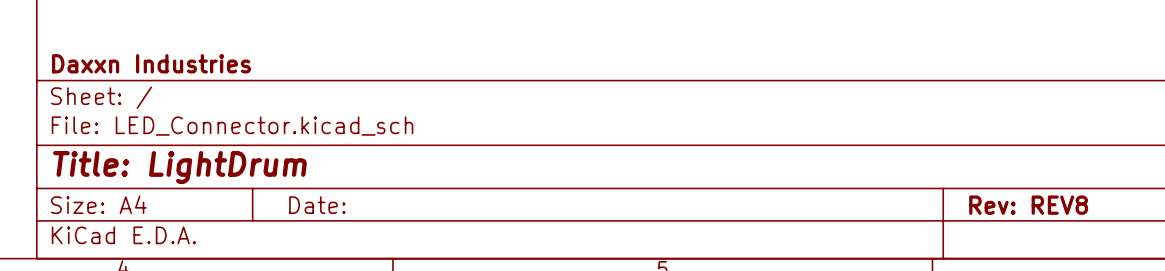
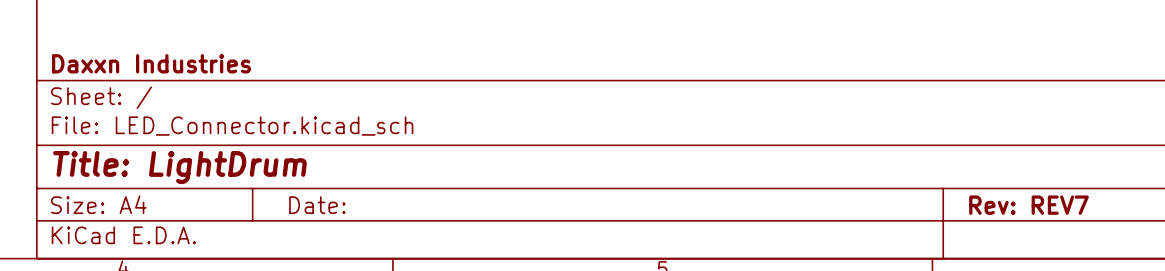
title block: Rev: REV8 (1028, 205) -> Rev: REV7 (1029, 205)

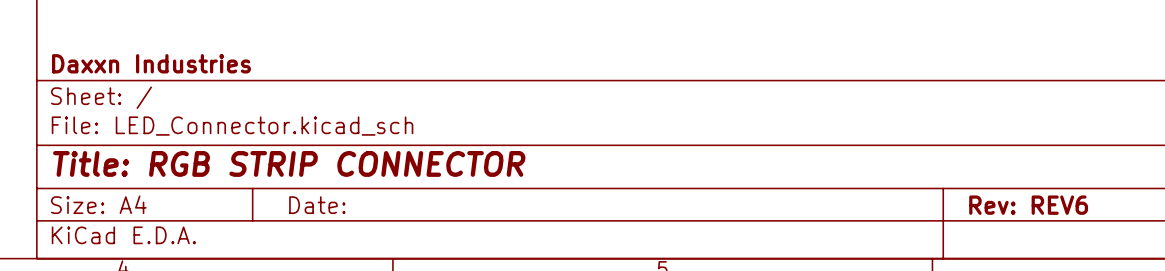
title block: Title: LightDrum (179, 167) -> Title: RGB STRIP CONNECTOR (289, 163)
title block: Rev: REV7 (1029, 205) -> Rev: REV6 (1028, 205)

